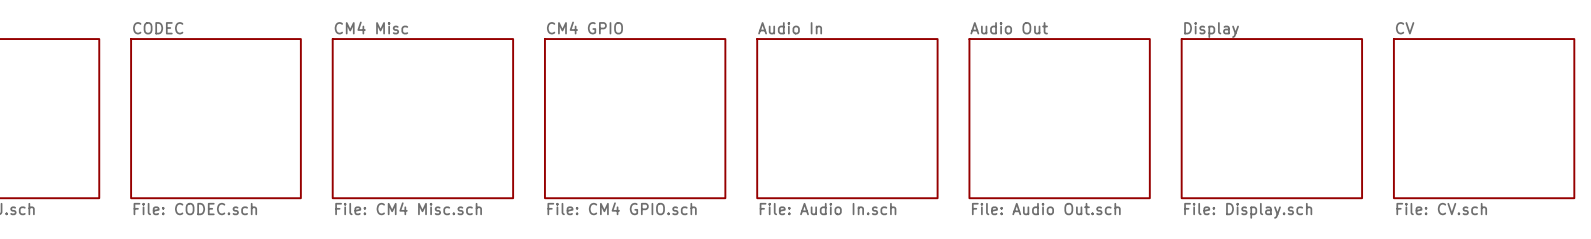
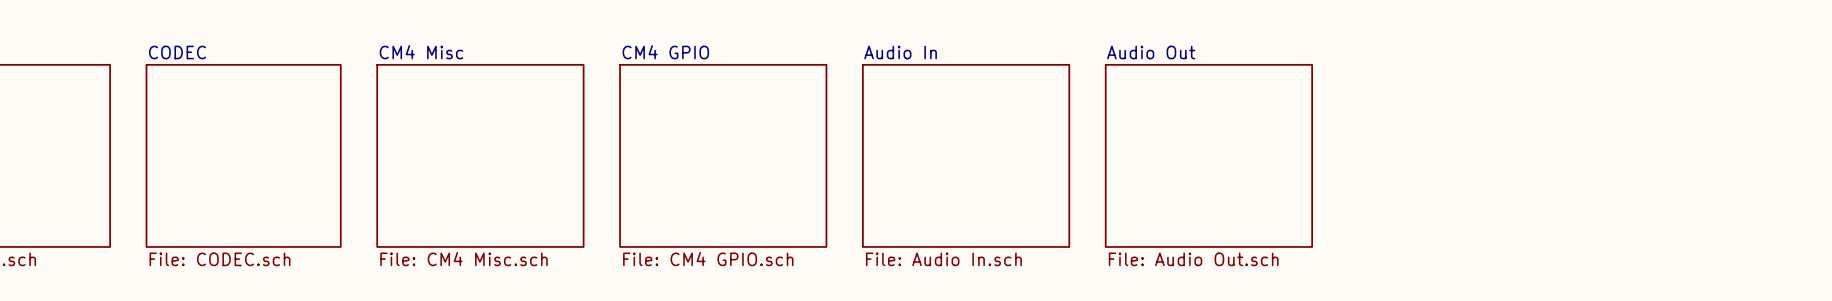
sheet Display: File: Display.sch (1271, 118) -> none
sheet CV: File: CV.sch (1484, 118) -> none

